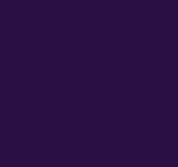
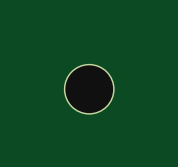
part: none -> (89, 89)

